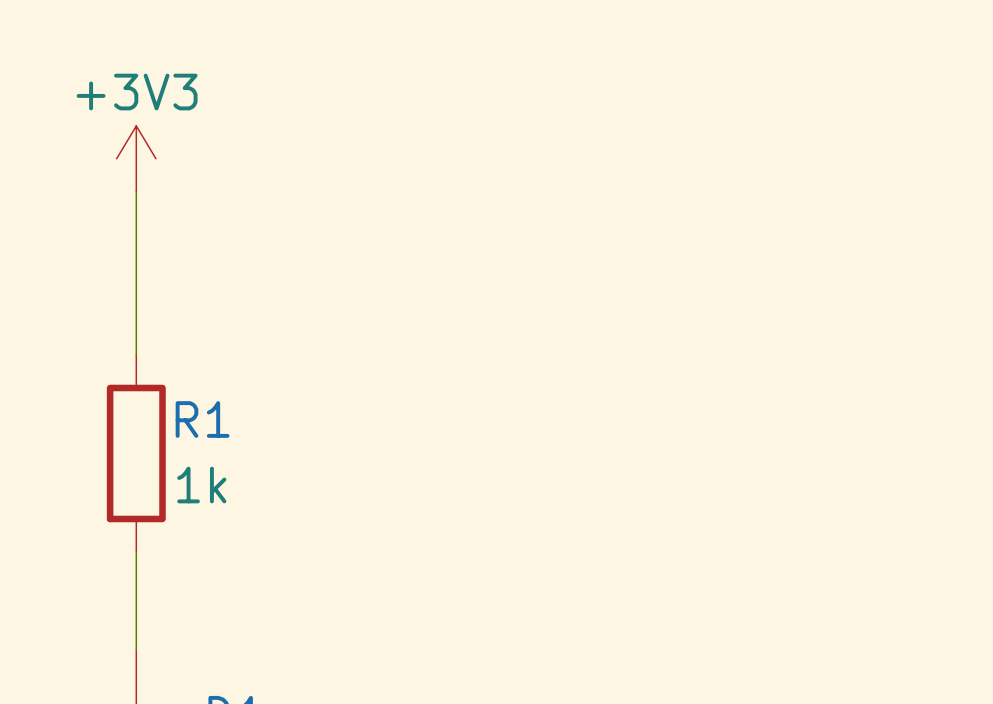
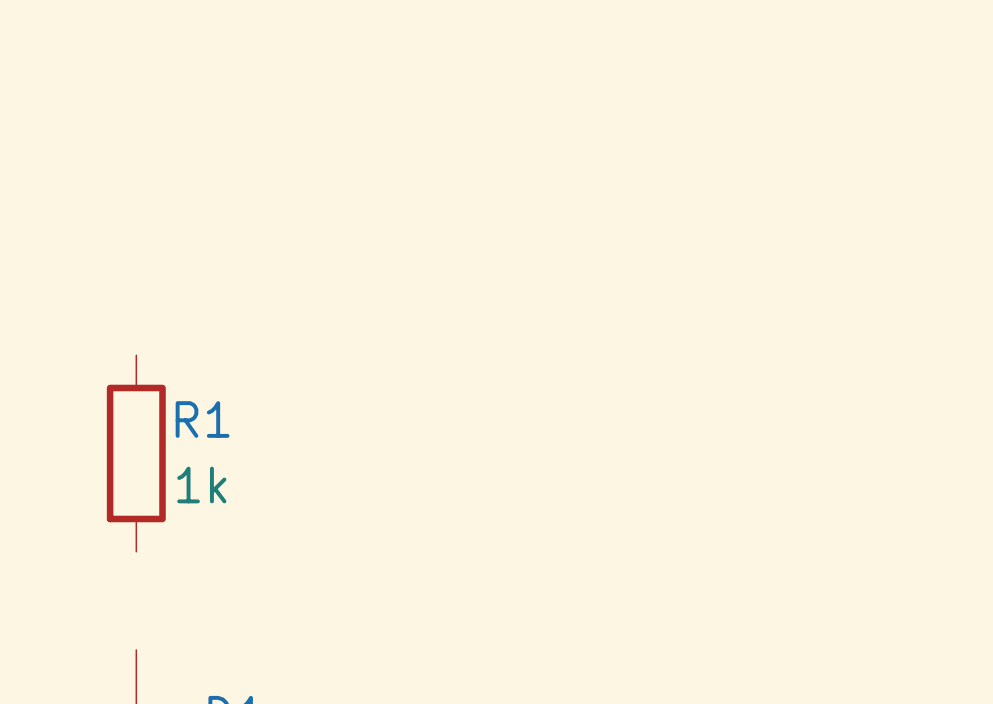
power symbol: +3V3 (136, 158) -> none
wire: (136, 191) (136, 355) -> none
wire: (136, 551) (136, 649) -> none

